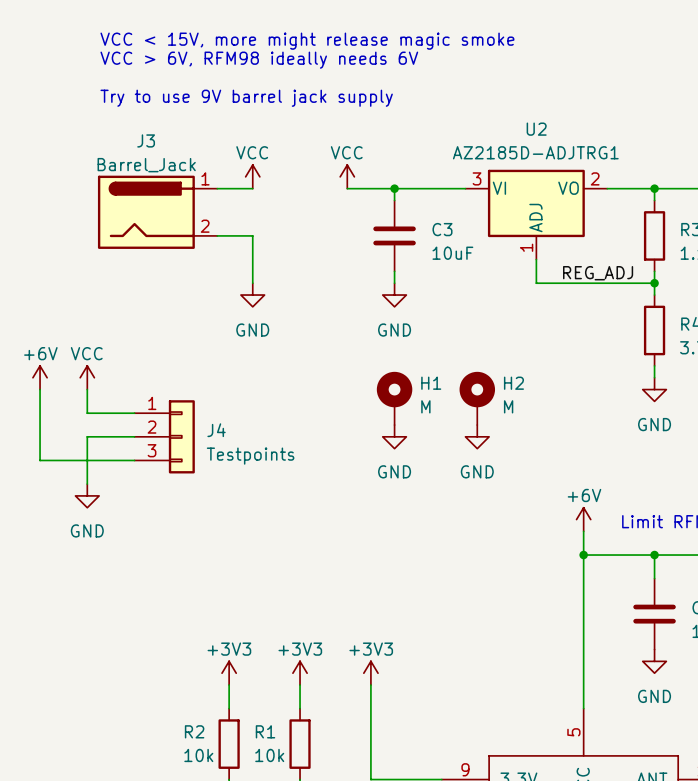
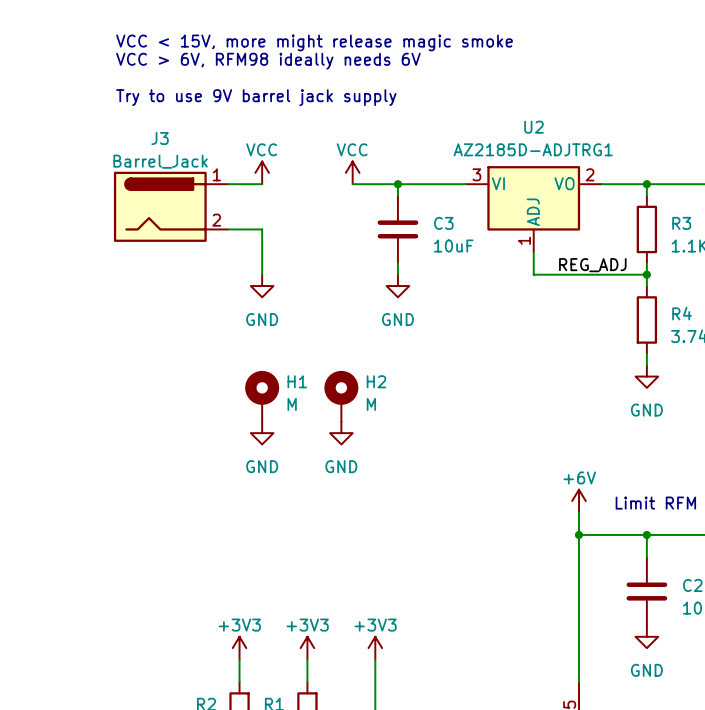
power symbol: +6V (40, 377) -> none
power symbol: VCC (87, 377) -> none
wire: (40, 389) (40, 460) (134, 460) -> none
wire: (87, 389) (87, 413) (134, 413) -> none
H1 position: (394, 398) -> (262, 396)
H2 position: (477, 398) -> (341, 396)
wire: (134, 436) (87, 436) (87, 484) -> none
J4: Testpoints (164, 436) -> none
power symbol position: GND (394, 436) -> GND (341, 433)
power symbol: GND (477, 436) -> none
power symbol: none -> GND (262, 433)
power symbol: GND (87, 495) -> none

